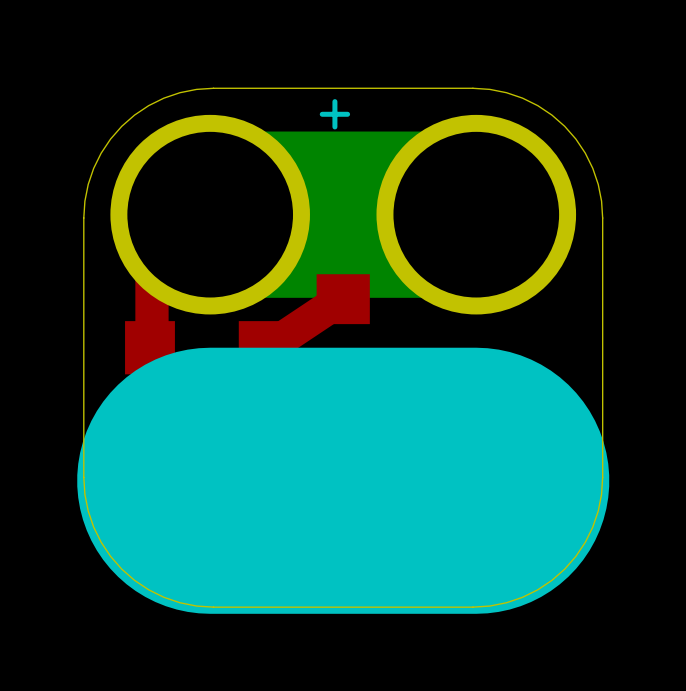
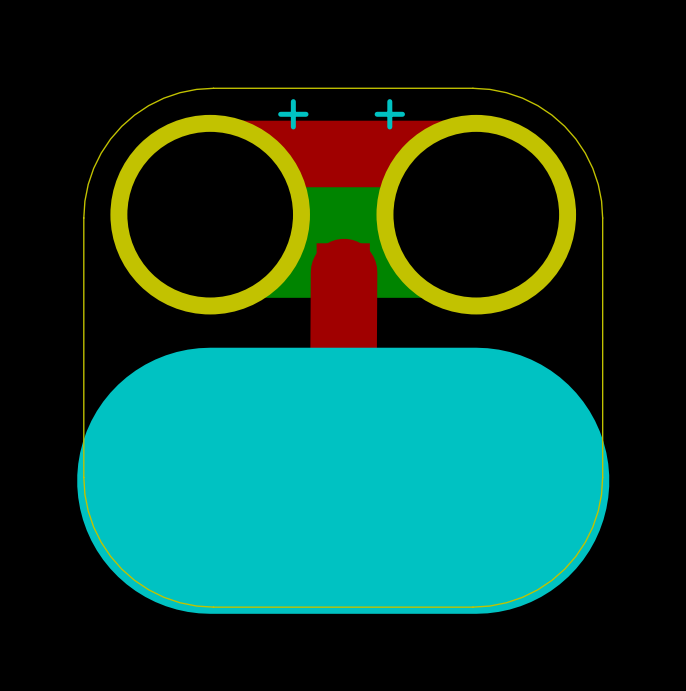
part footprint: [77, 87, 610, 614] -> [77, 87, 610, 614]

